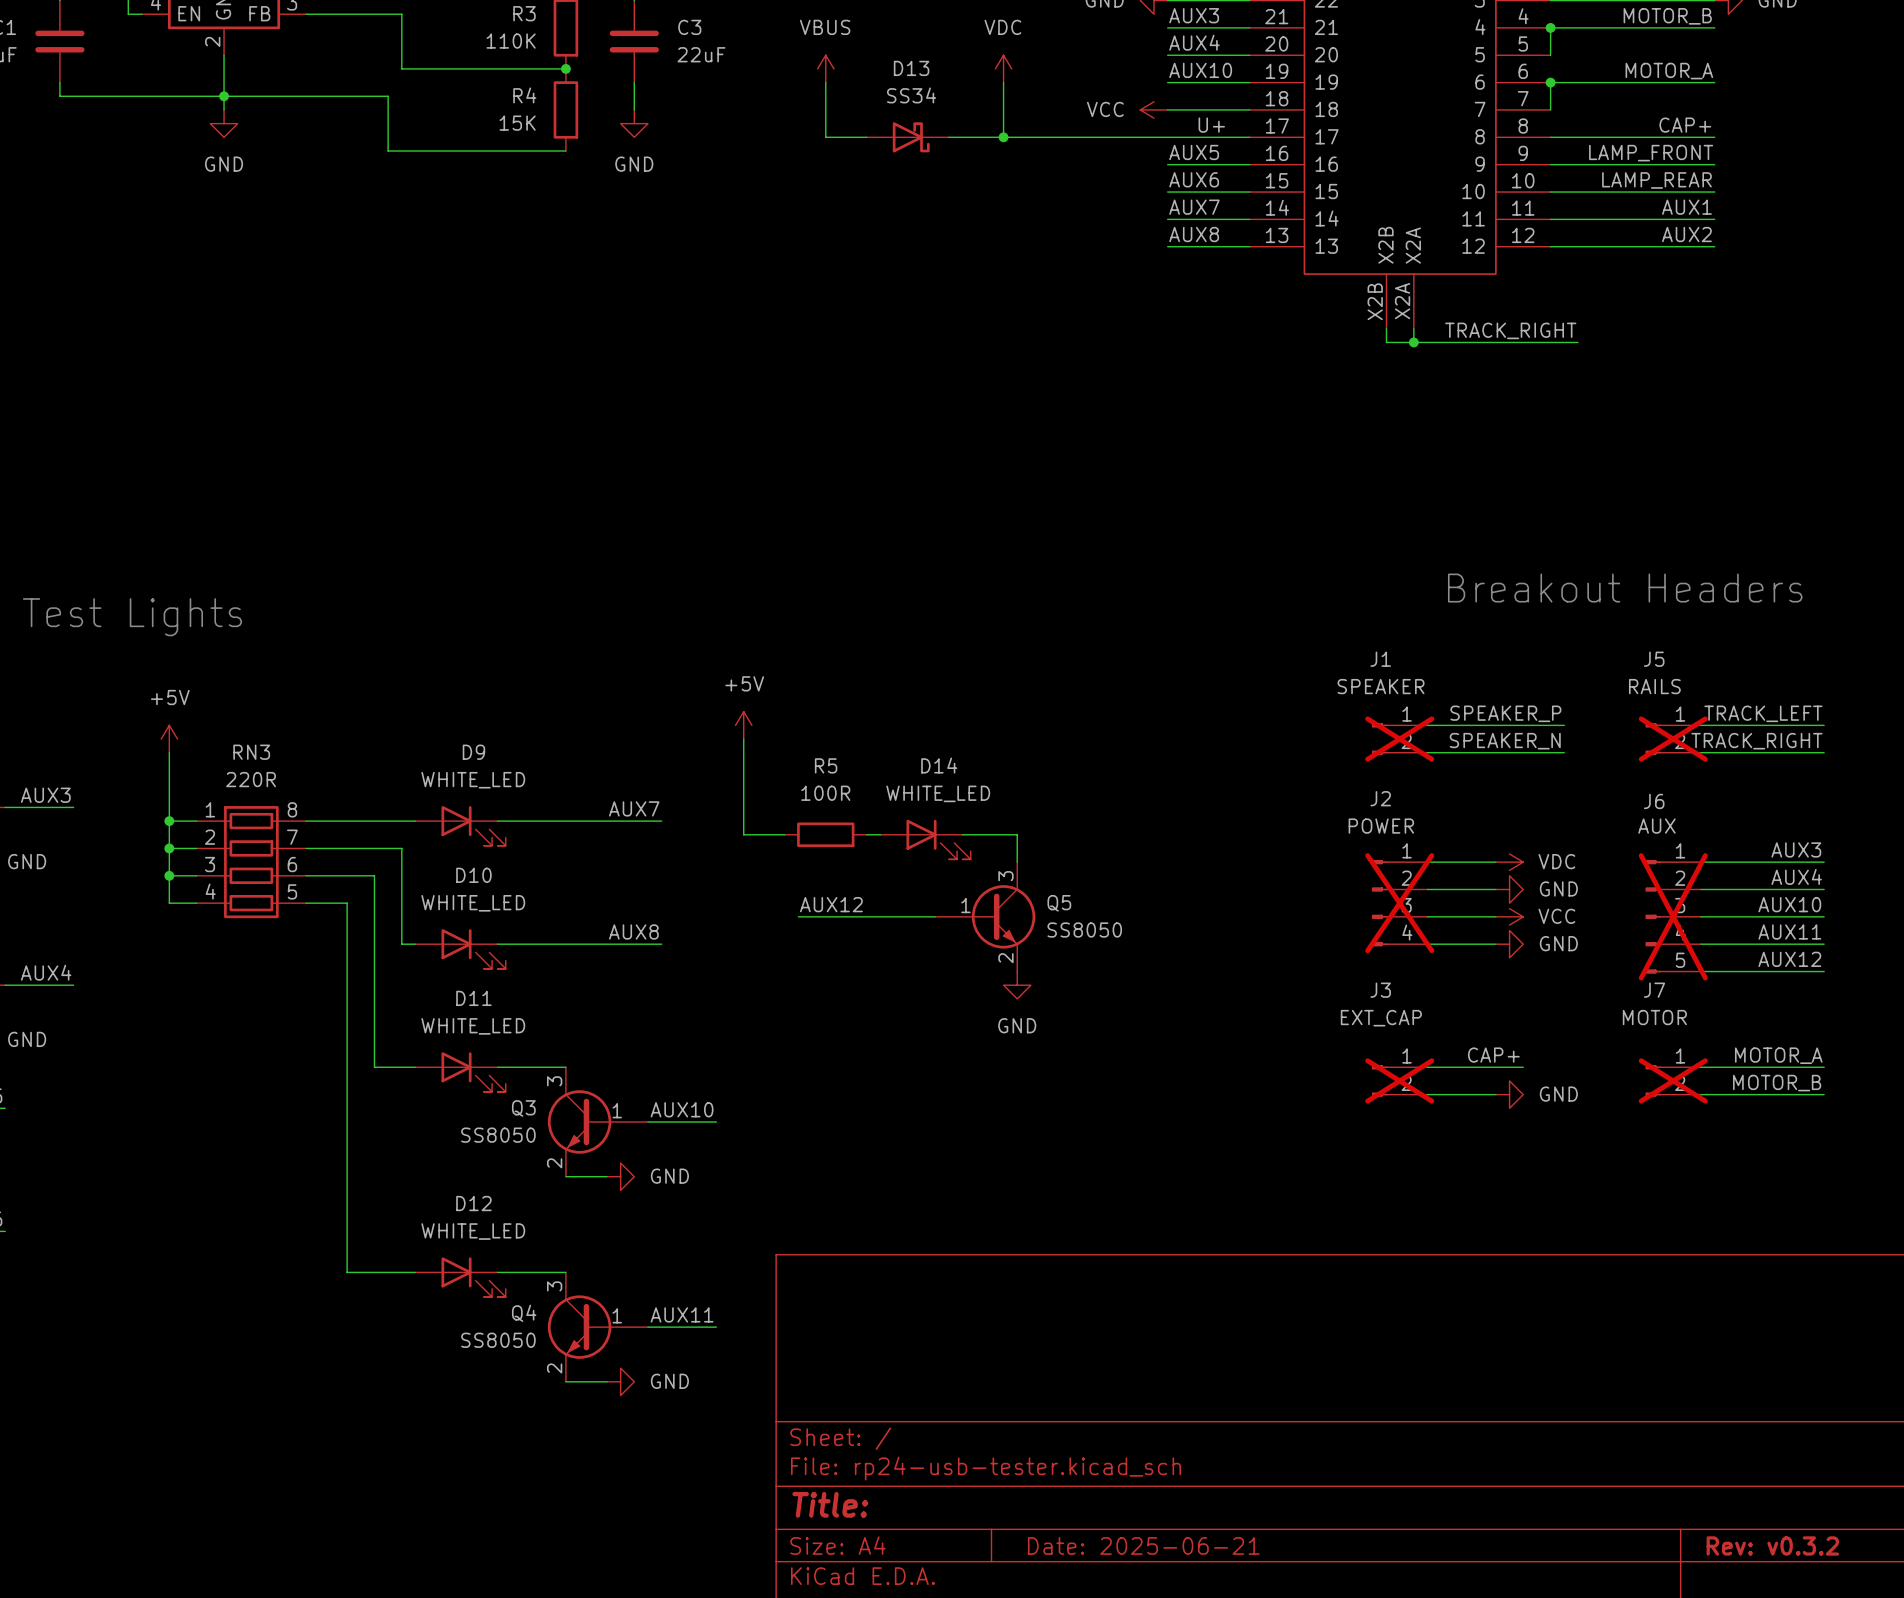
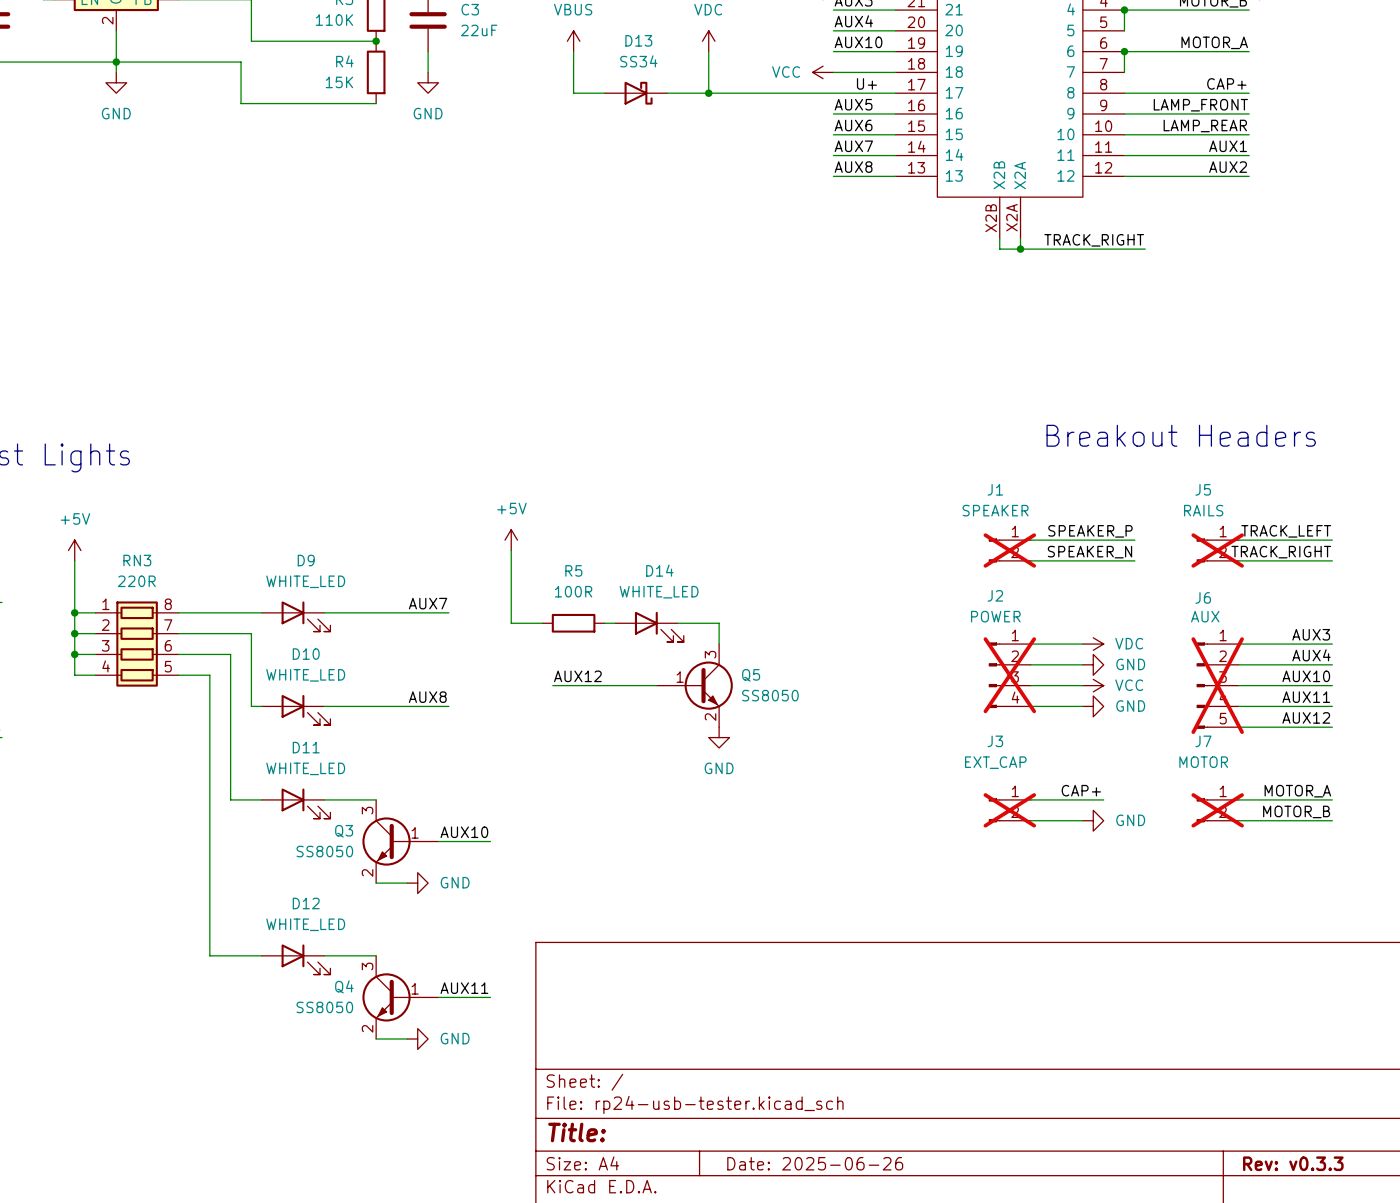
title block: Date: 2025-06-21 (1143, 1545) -> Date: 2025-06-26 (815, 1163)
title block: Rev: v0.3.2 (1772, 1545) -> Rev: v0.3.3 (1293, 1163)

